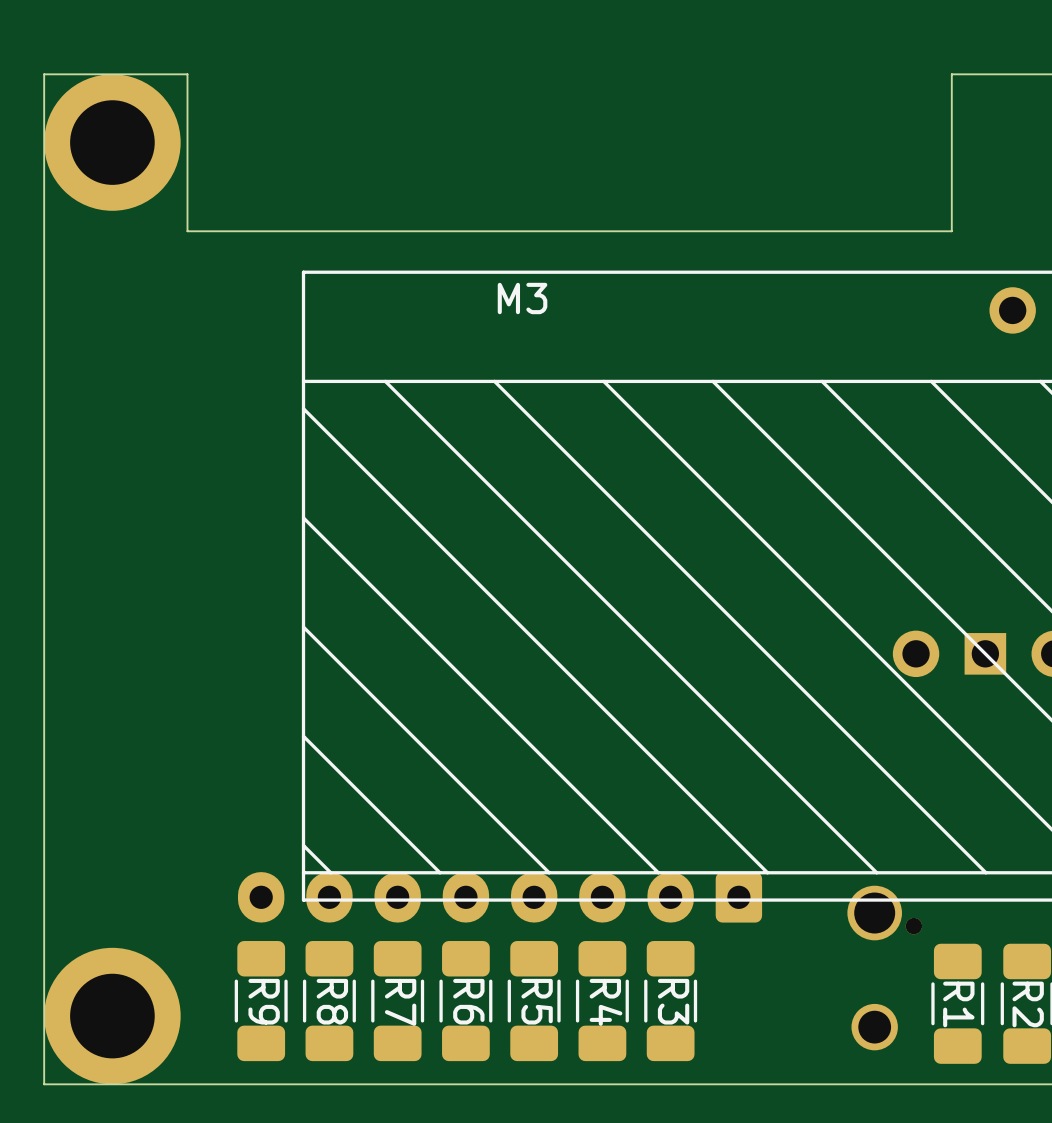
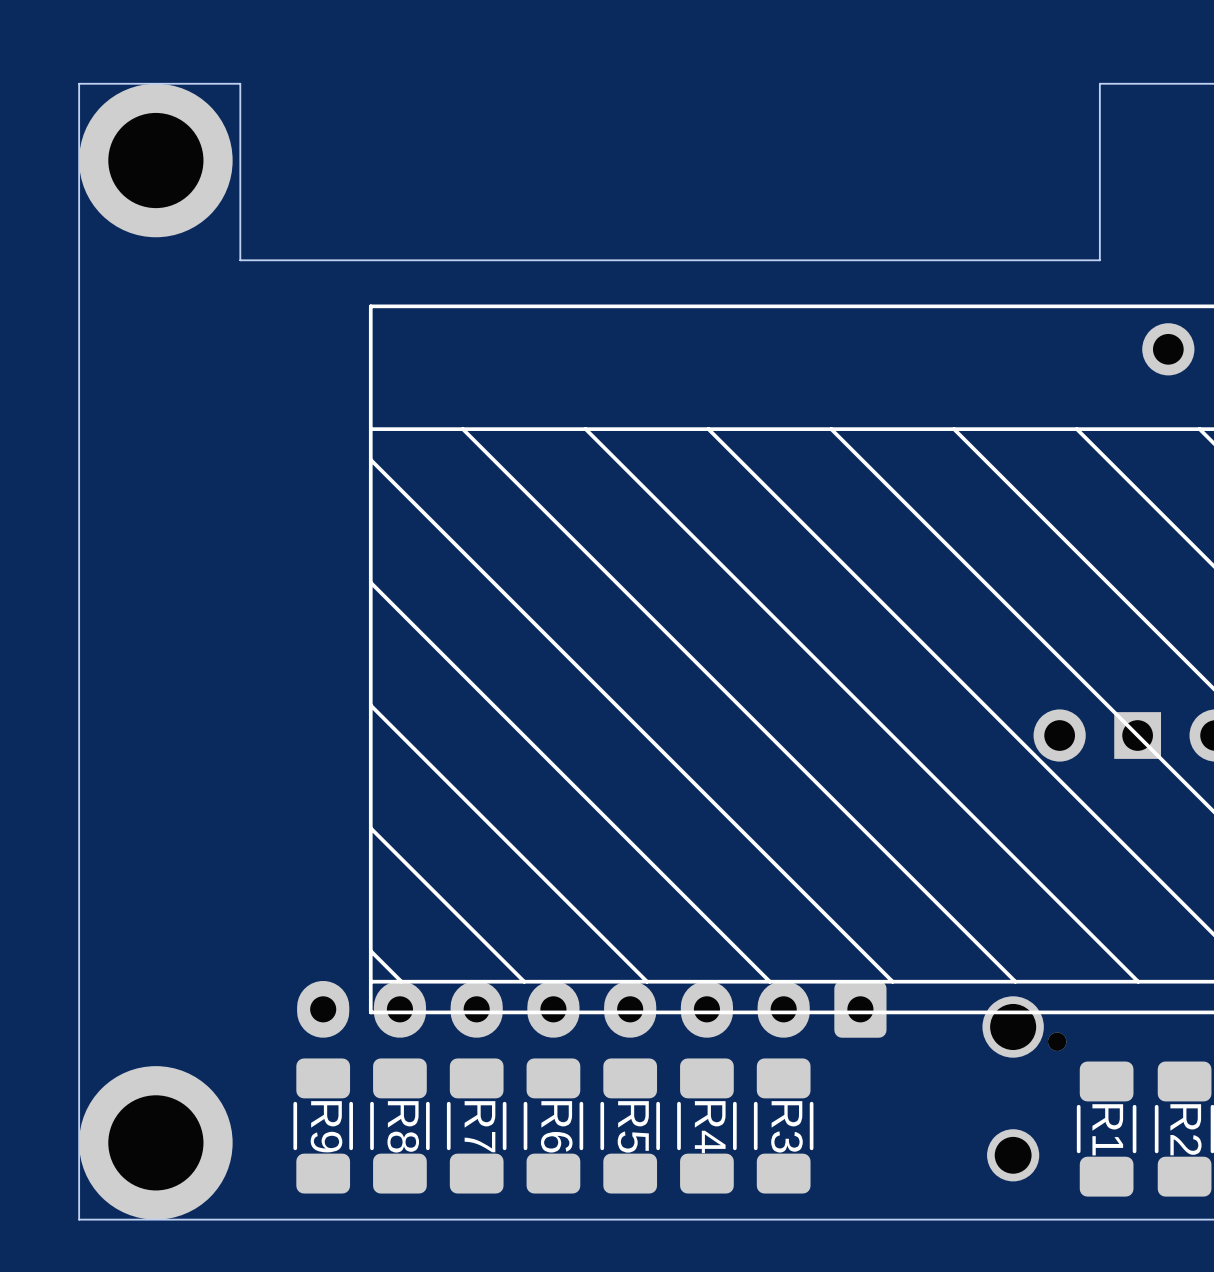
M3 name: M3 (522, 298) -> none

